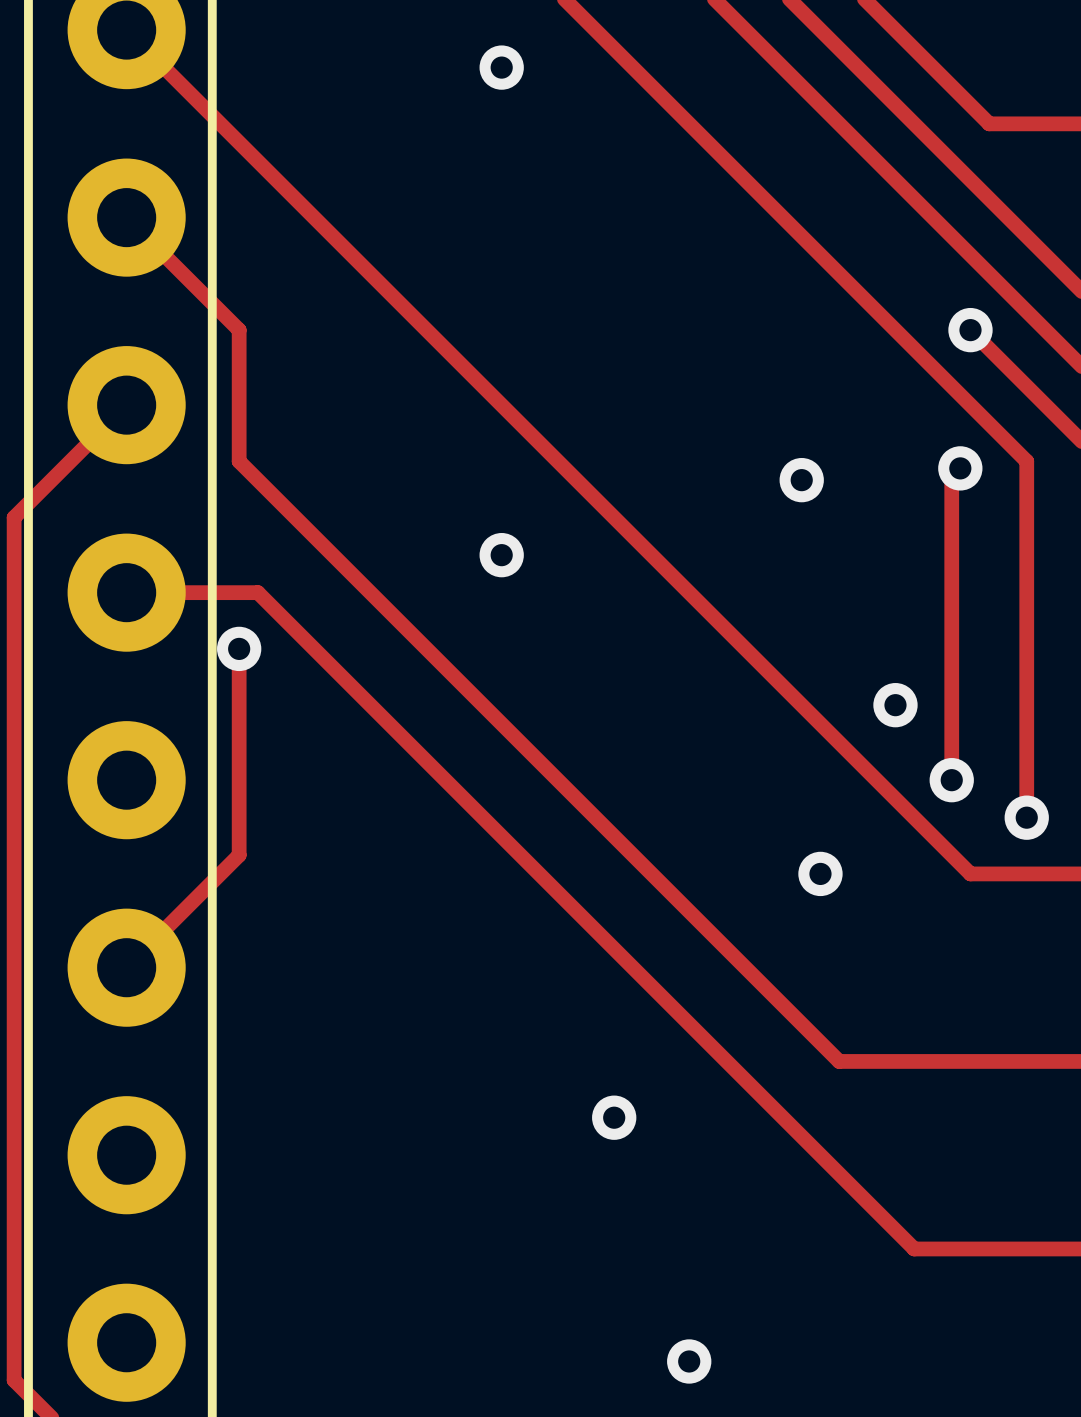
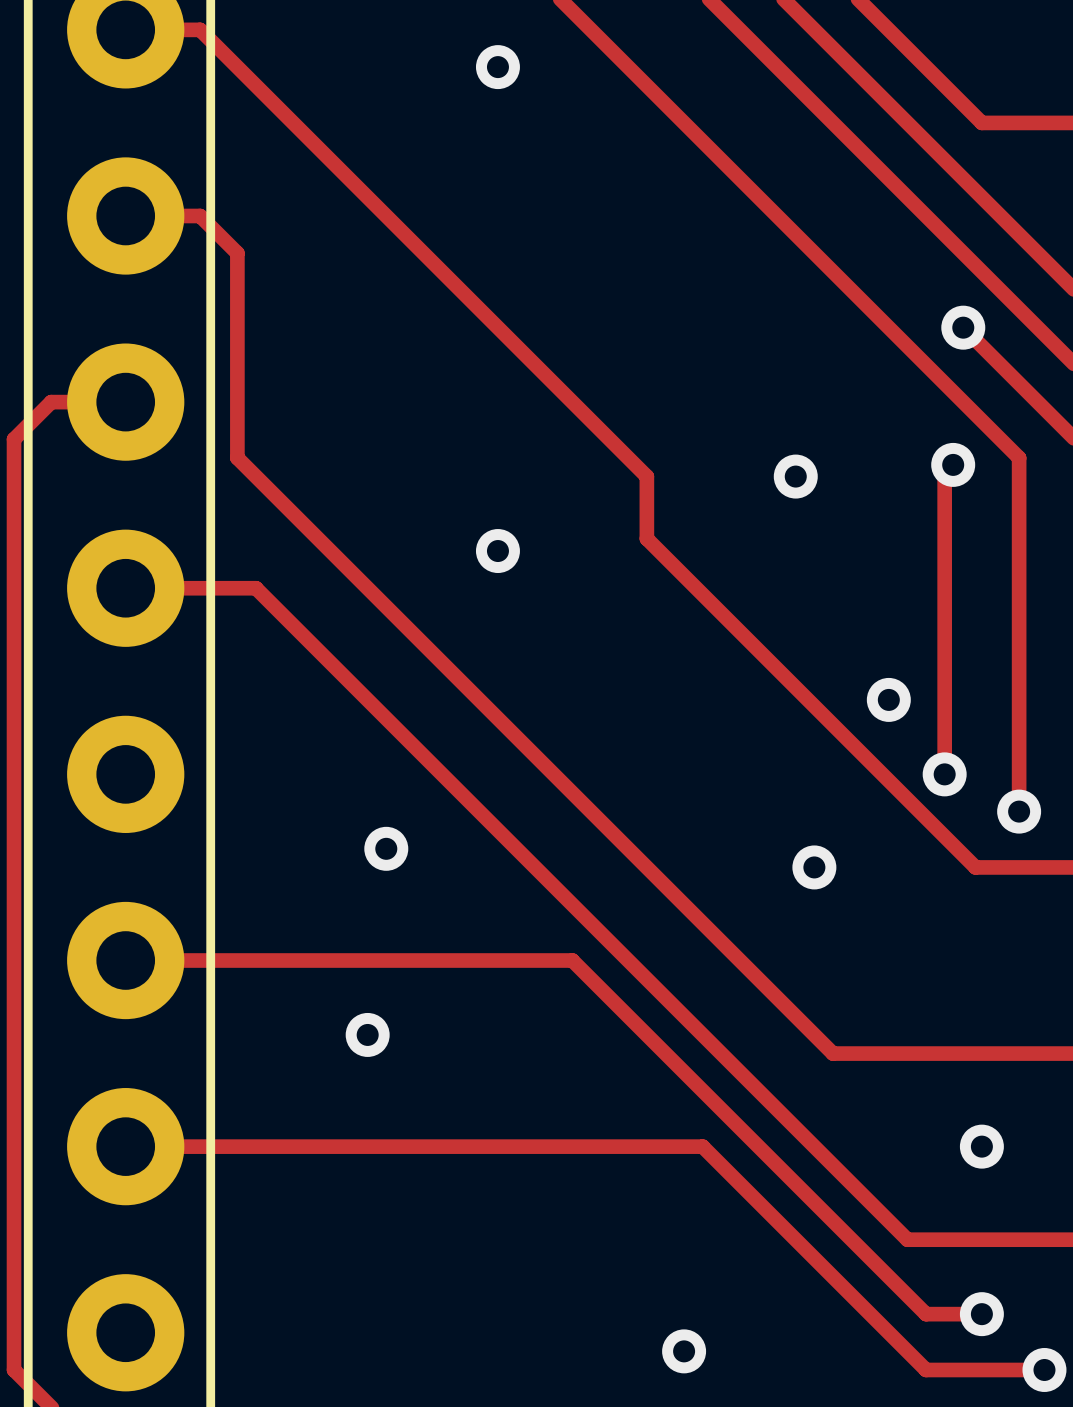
track: (126, 30) (970, 873) (982, 873) -> (125, 29) (200, 29) (646, 476) (646, 538) (975, 867)
track: (126, 217) (239, 330) -> (125, 215) (200, 215) (237, 253) (237, 327)
track: (126, 405) (14, 517) -> (125, 402) (51, 402) (14, 439) (14, 513)
track: (239, 648) (239, 855) (126, 967) -> (981, 1314) (926, 1314) (572, 960) (125, 960)
via: (239, 648) -> none
via: none -> (386, 848)
via: none -> (367, 1034)
via: (614, 1117) -> none
track: none -> (125, 1146) (702, 1146) (926, 1369) (1044, 1369)
via: none -> (981, 1146)
via: none -> (981, 1314)
via: none -> (1044, 1369)

